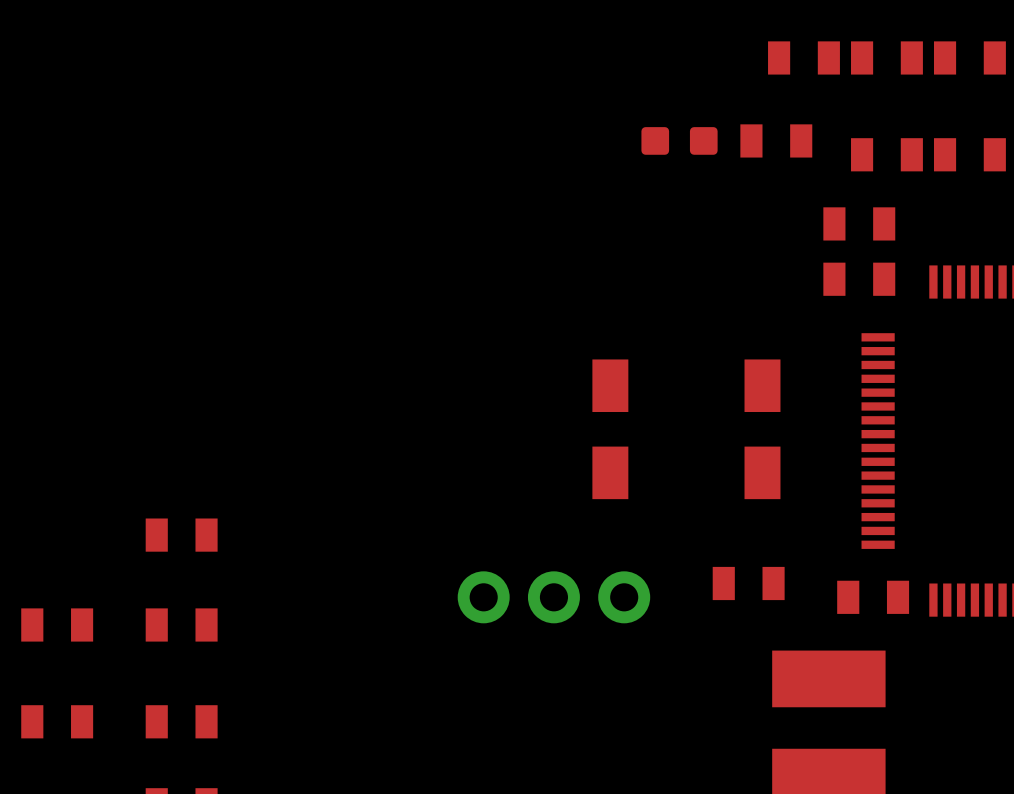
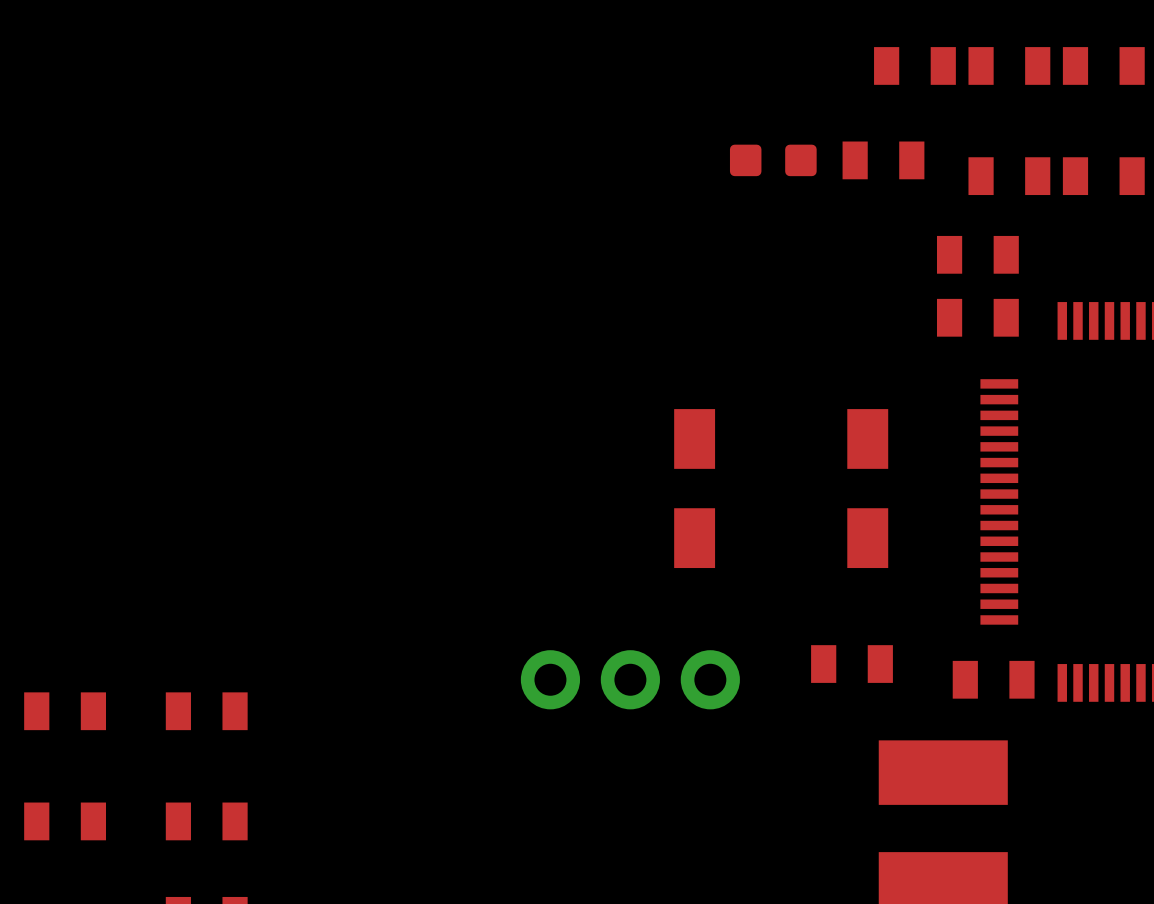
part: (181, 535) -> none

